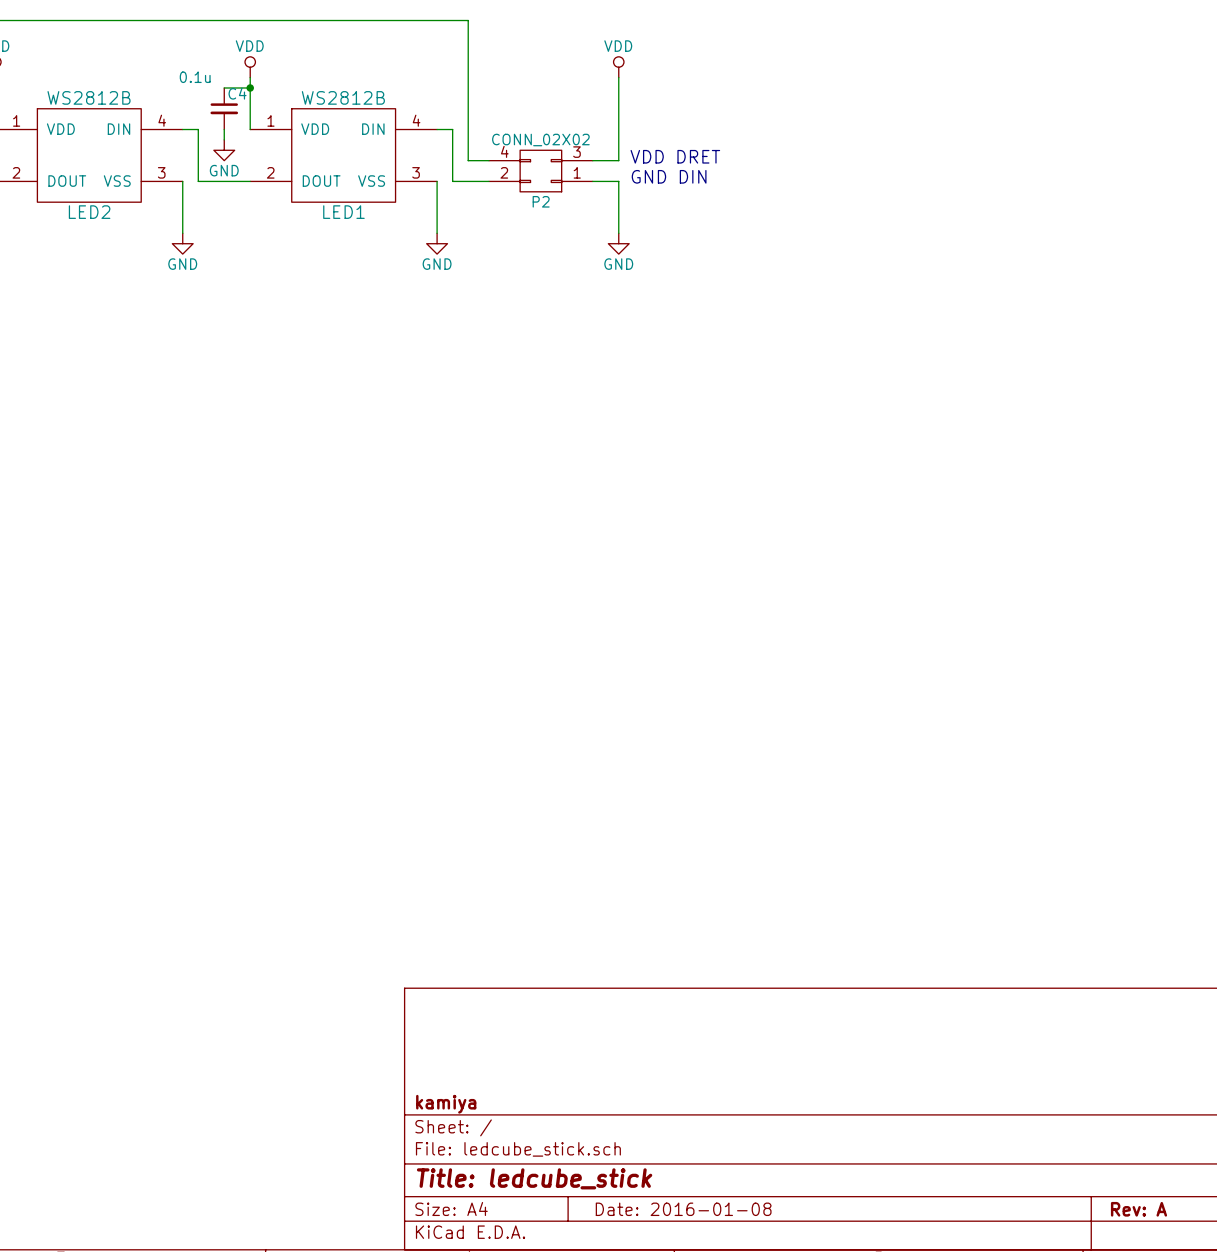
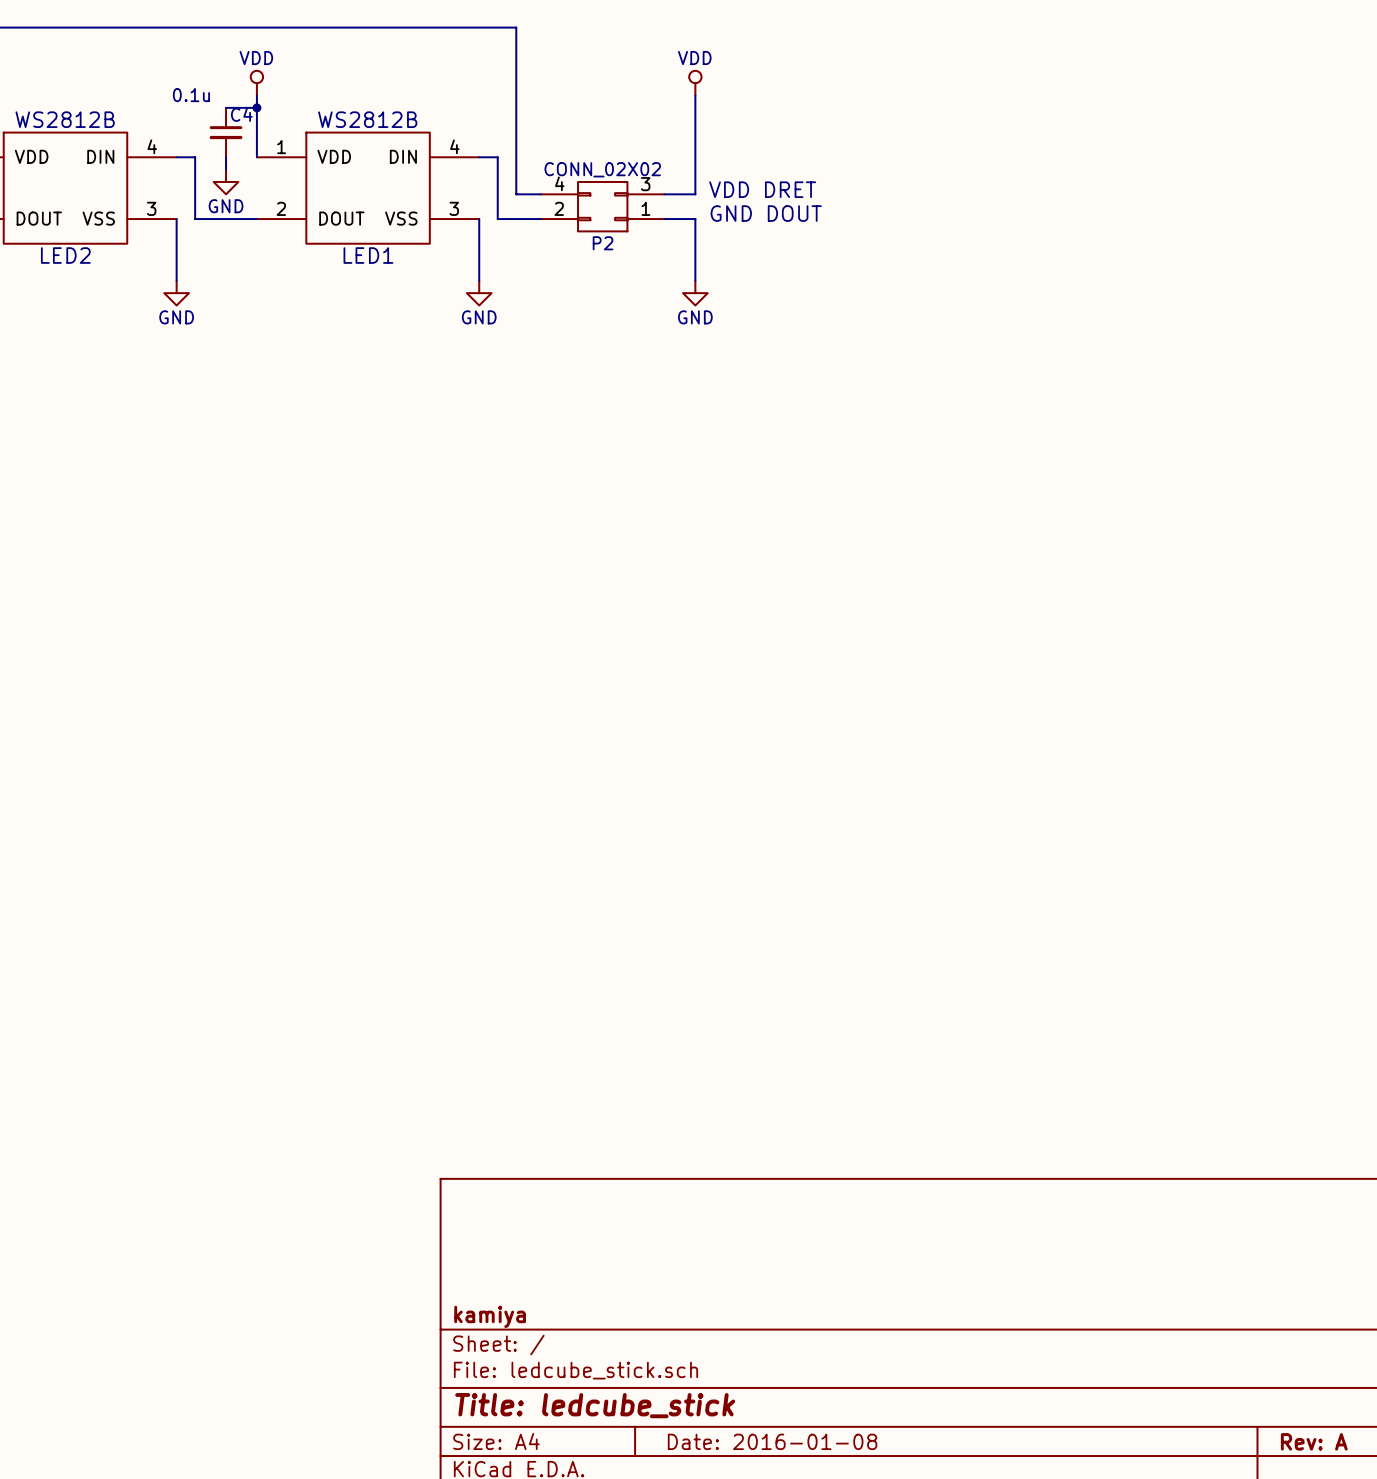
text: GND DIN (669, 176) -> GND DOUT (766, 213)

